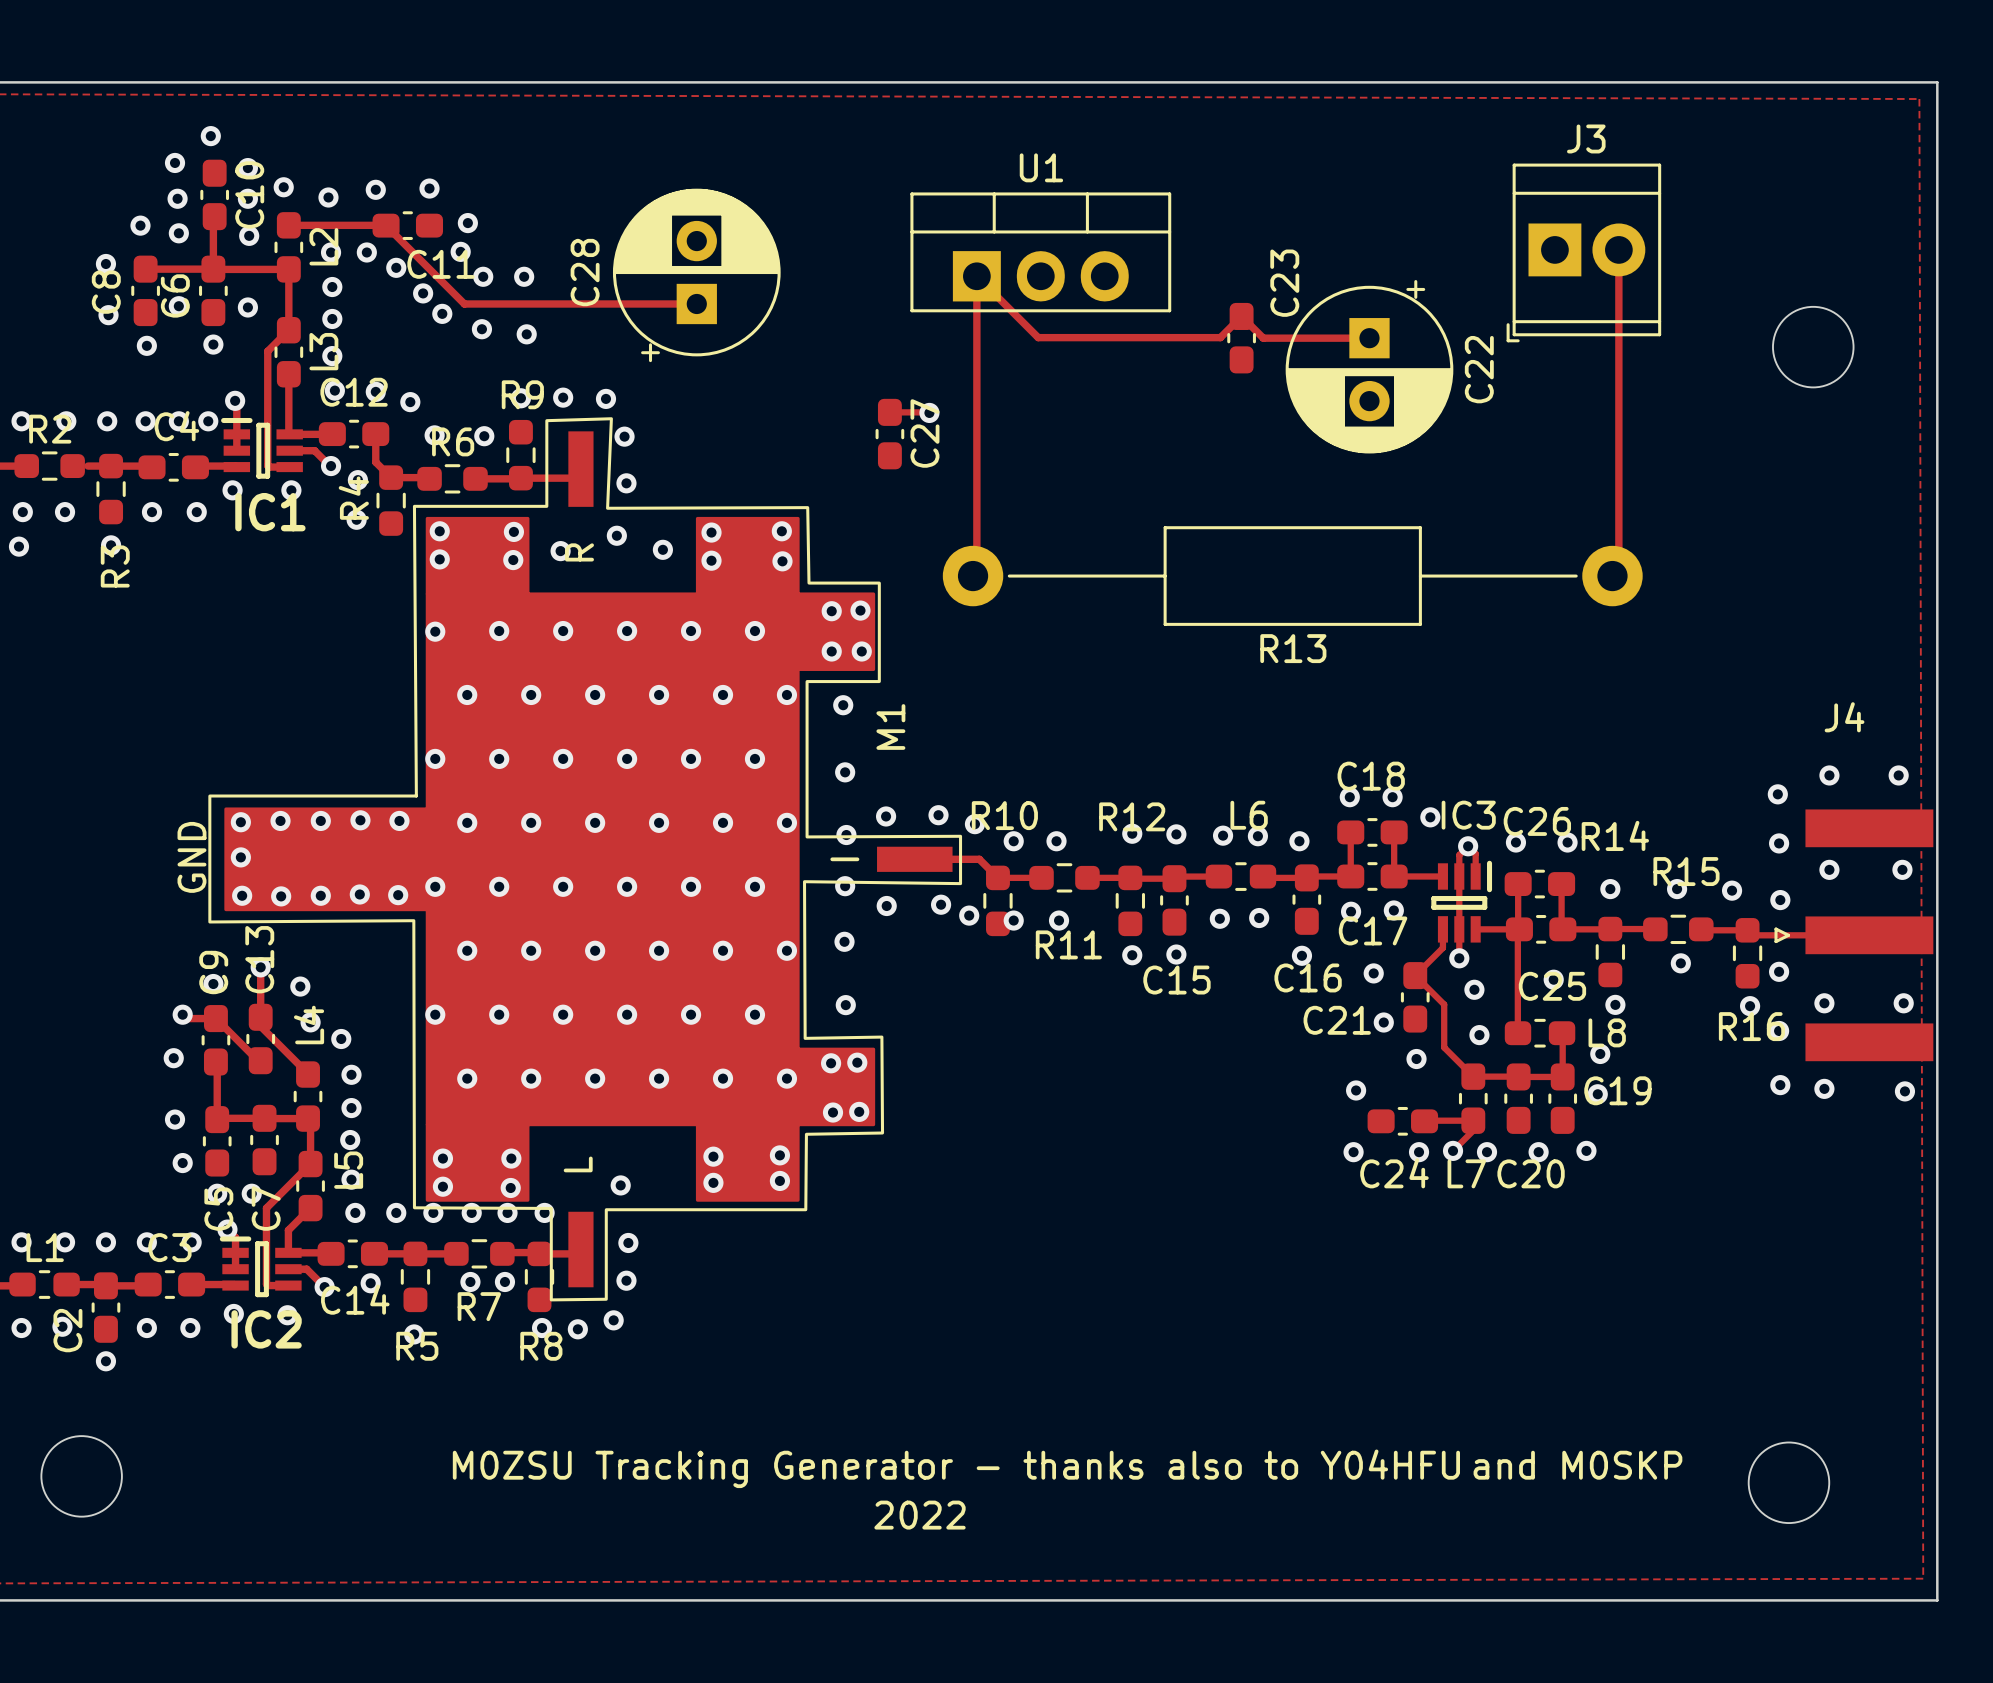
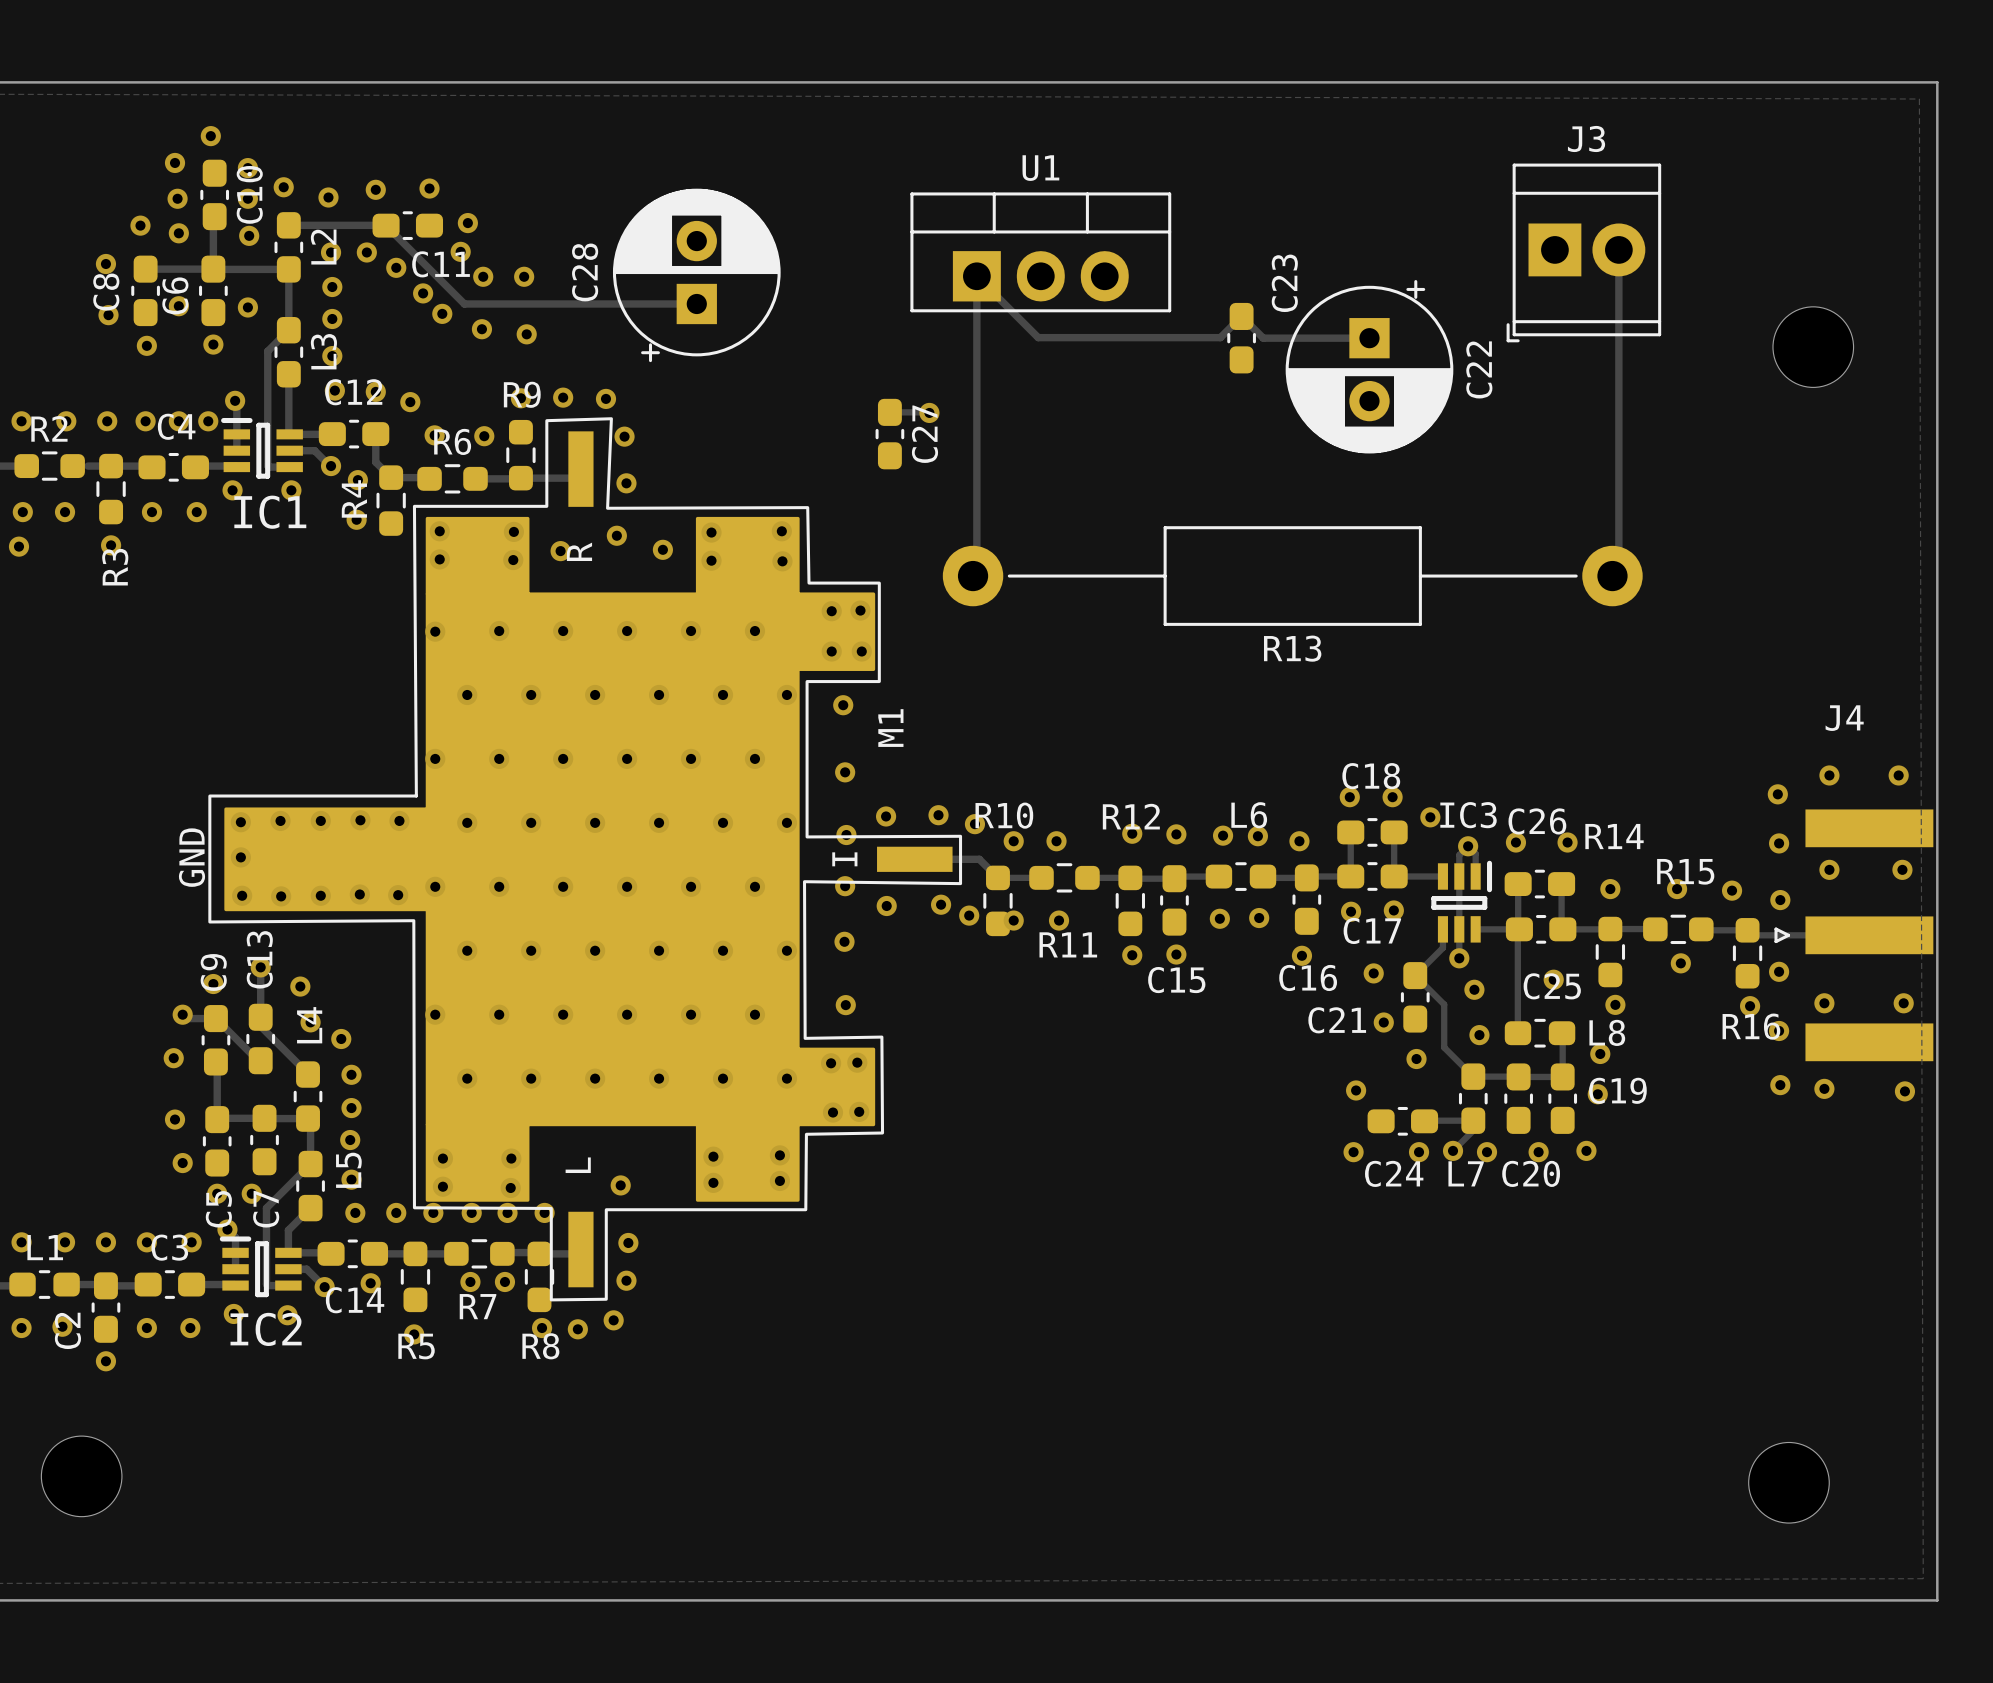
text: and M0SKP (1577, 1465) -> none
text: M0ZSU Tracking Generator - thanks also to Y04HFU (956, 1468) -> none
text: 2022 (920, 1515) -> none

